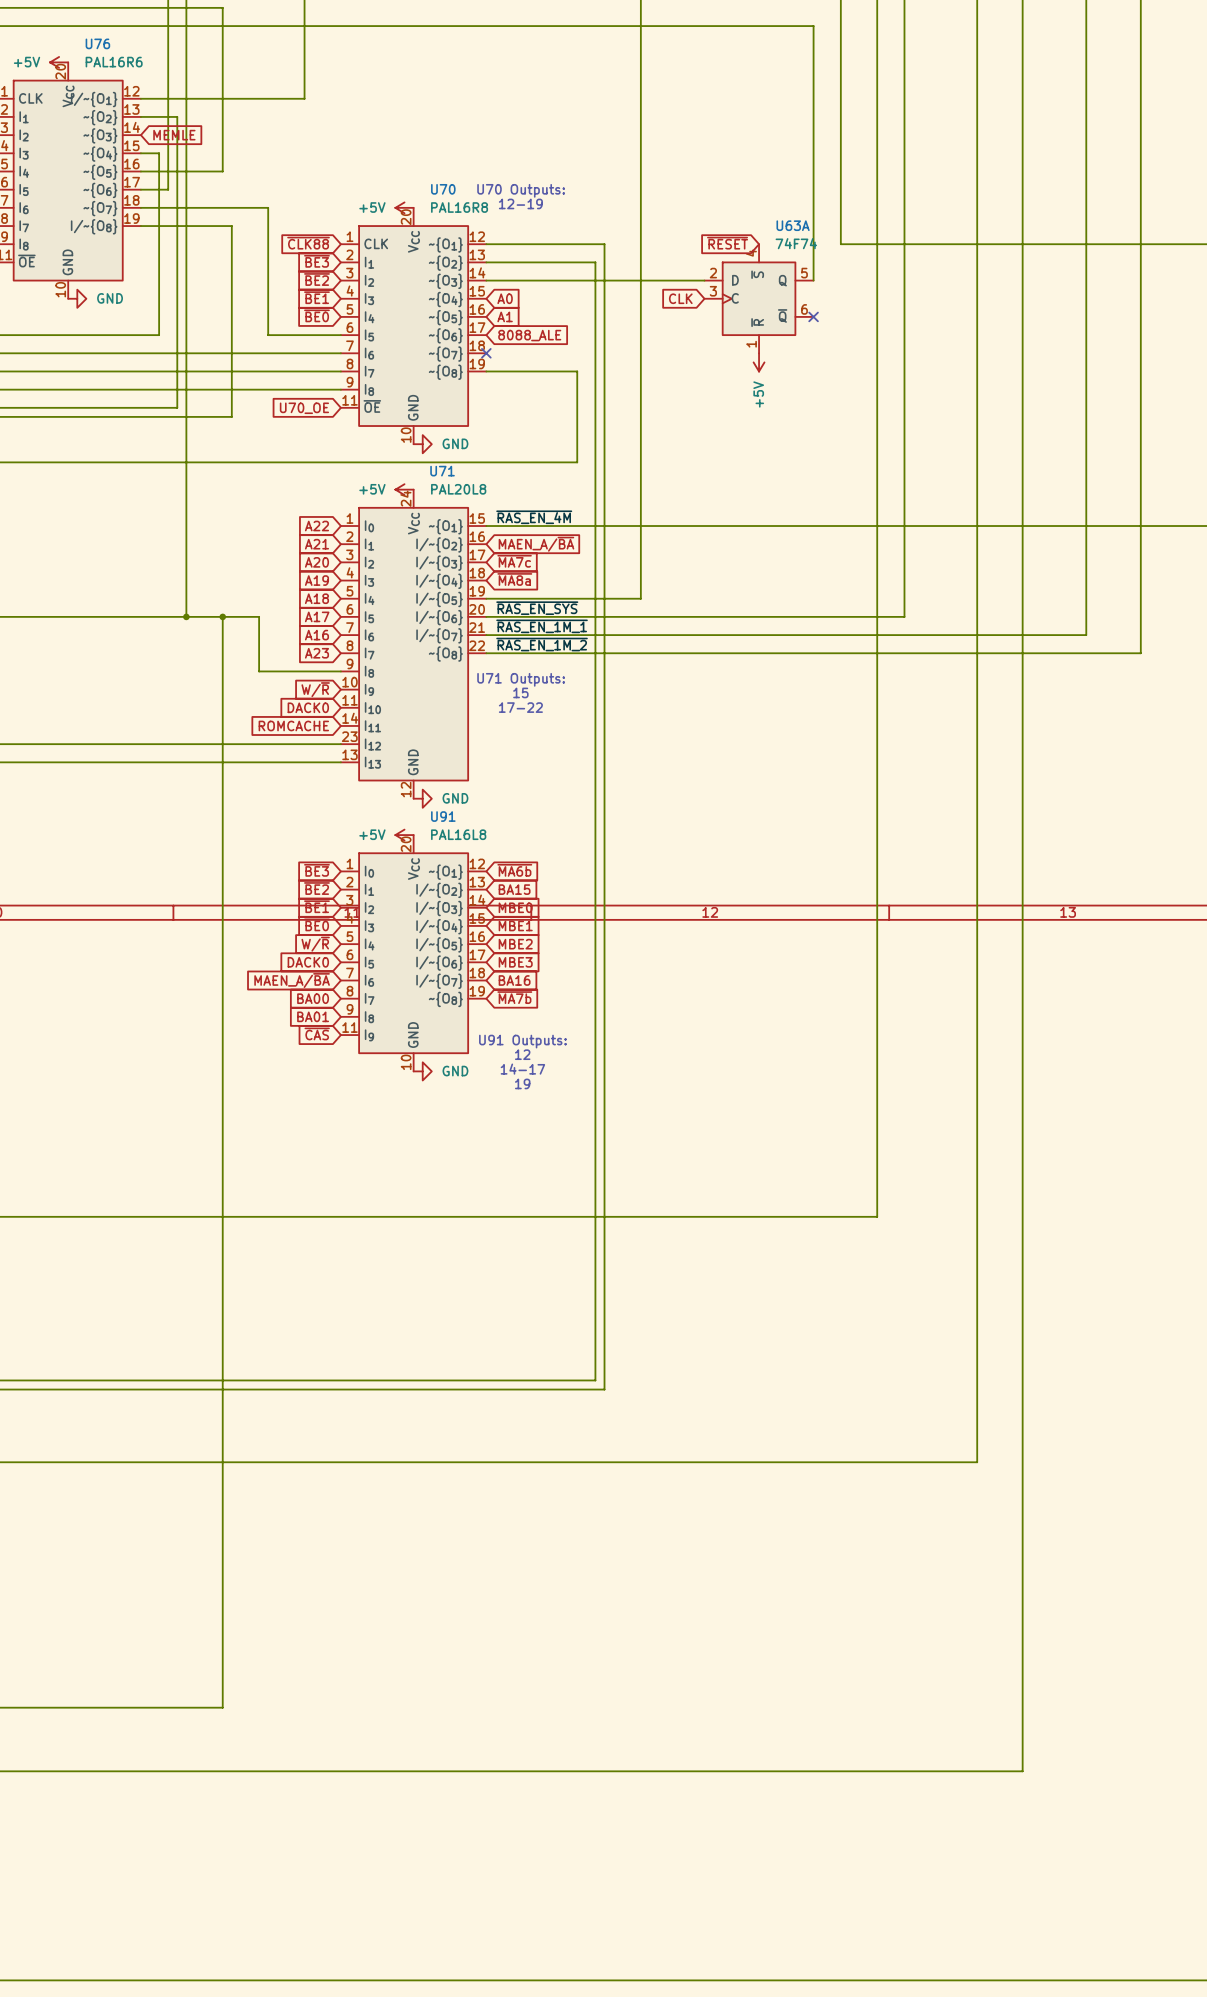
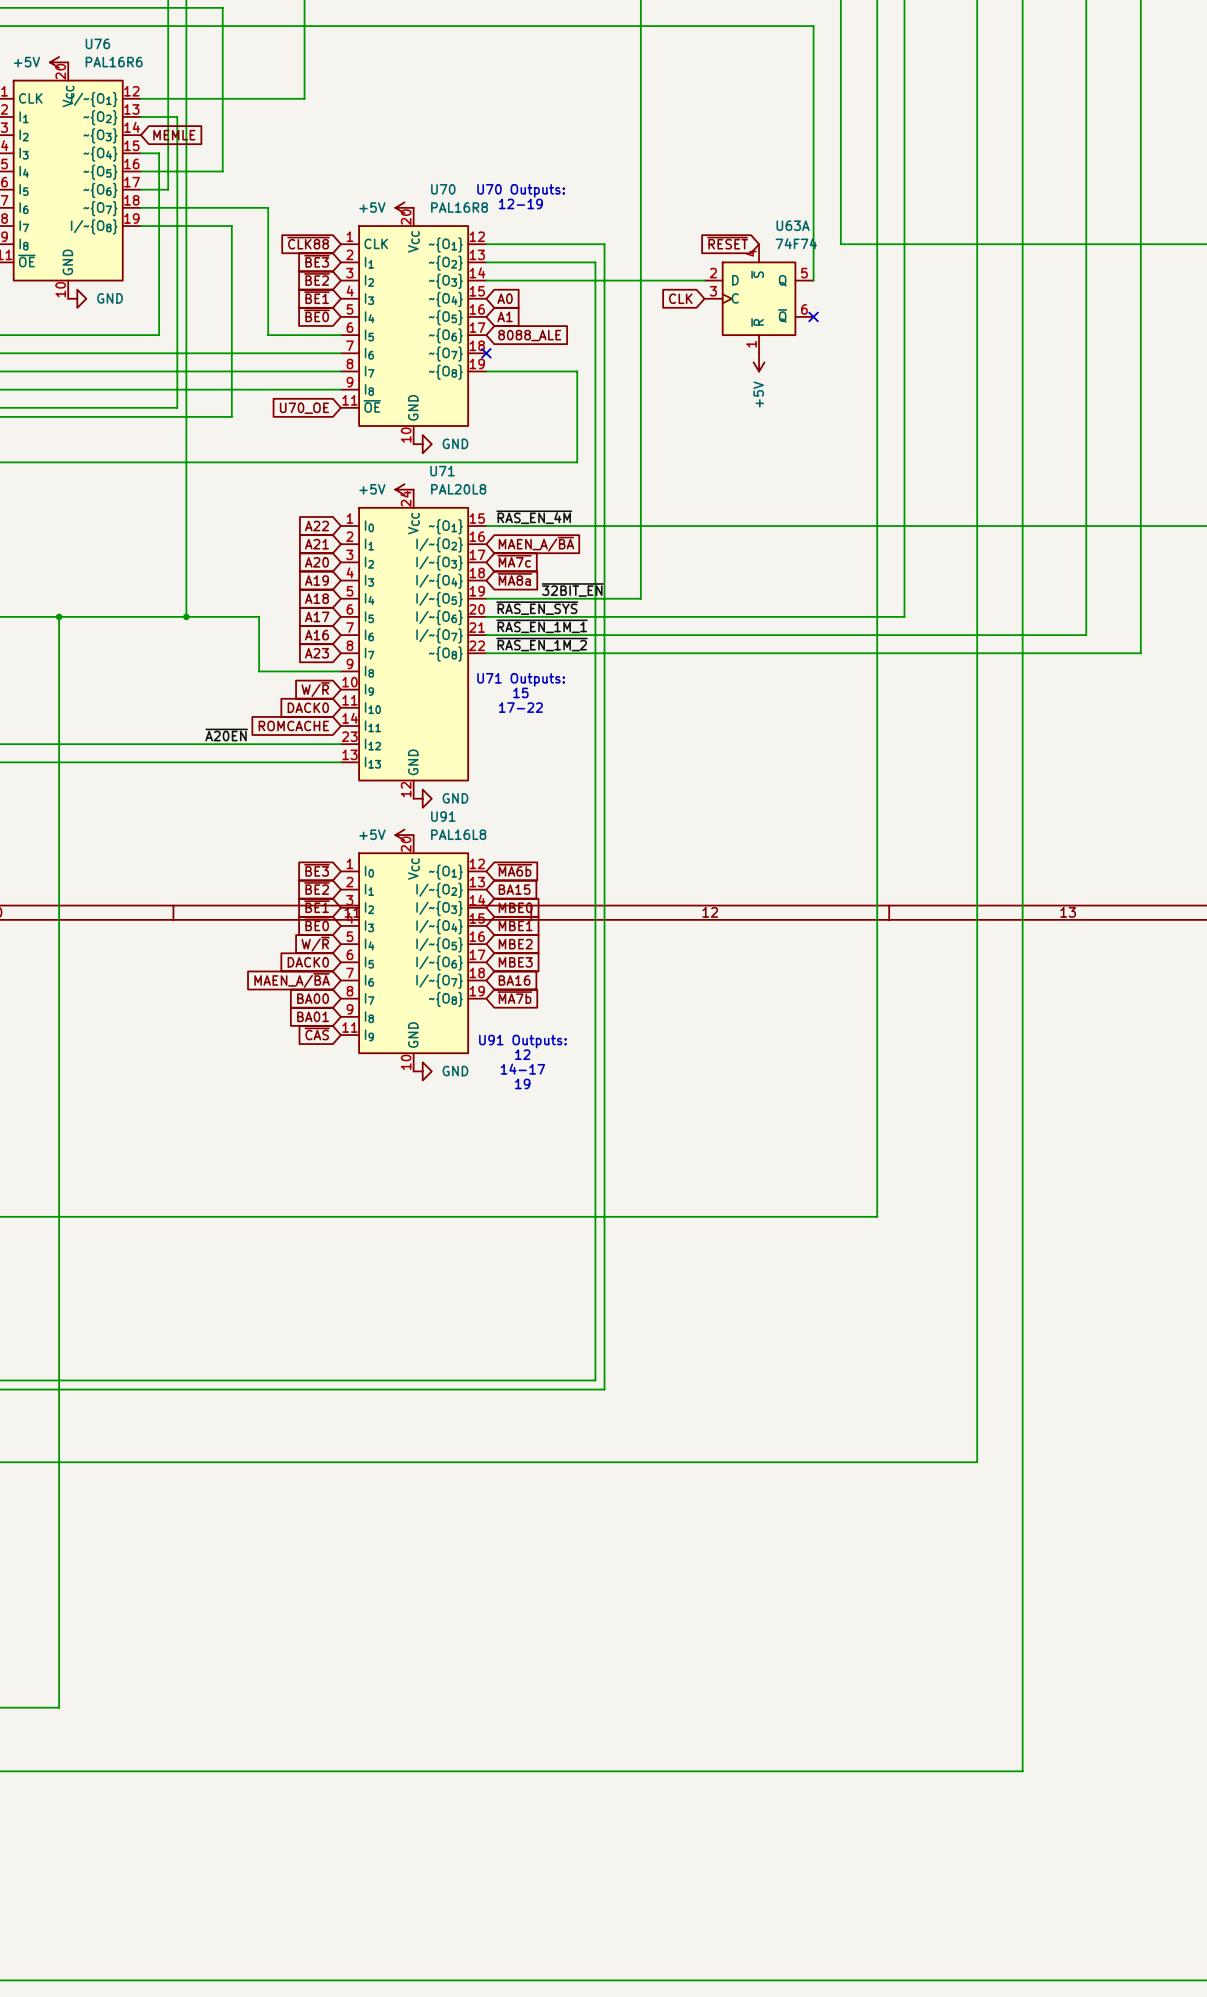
label: none -> ~{32BIT_EN} (572, 590)
junction: none -> (59, 616)
wire: (222, 616) (222, 1707) (59, 1707) -> (59, 616) (59, 1707)
junction: (222, 616) -> none
label: none -> ~{A20EN} (226, 735)

